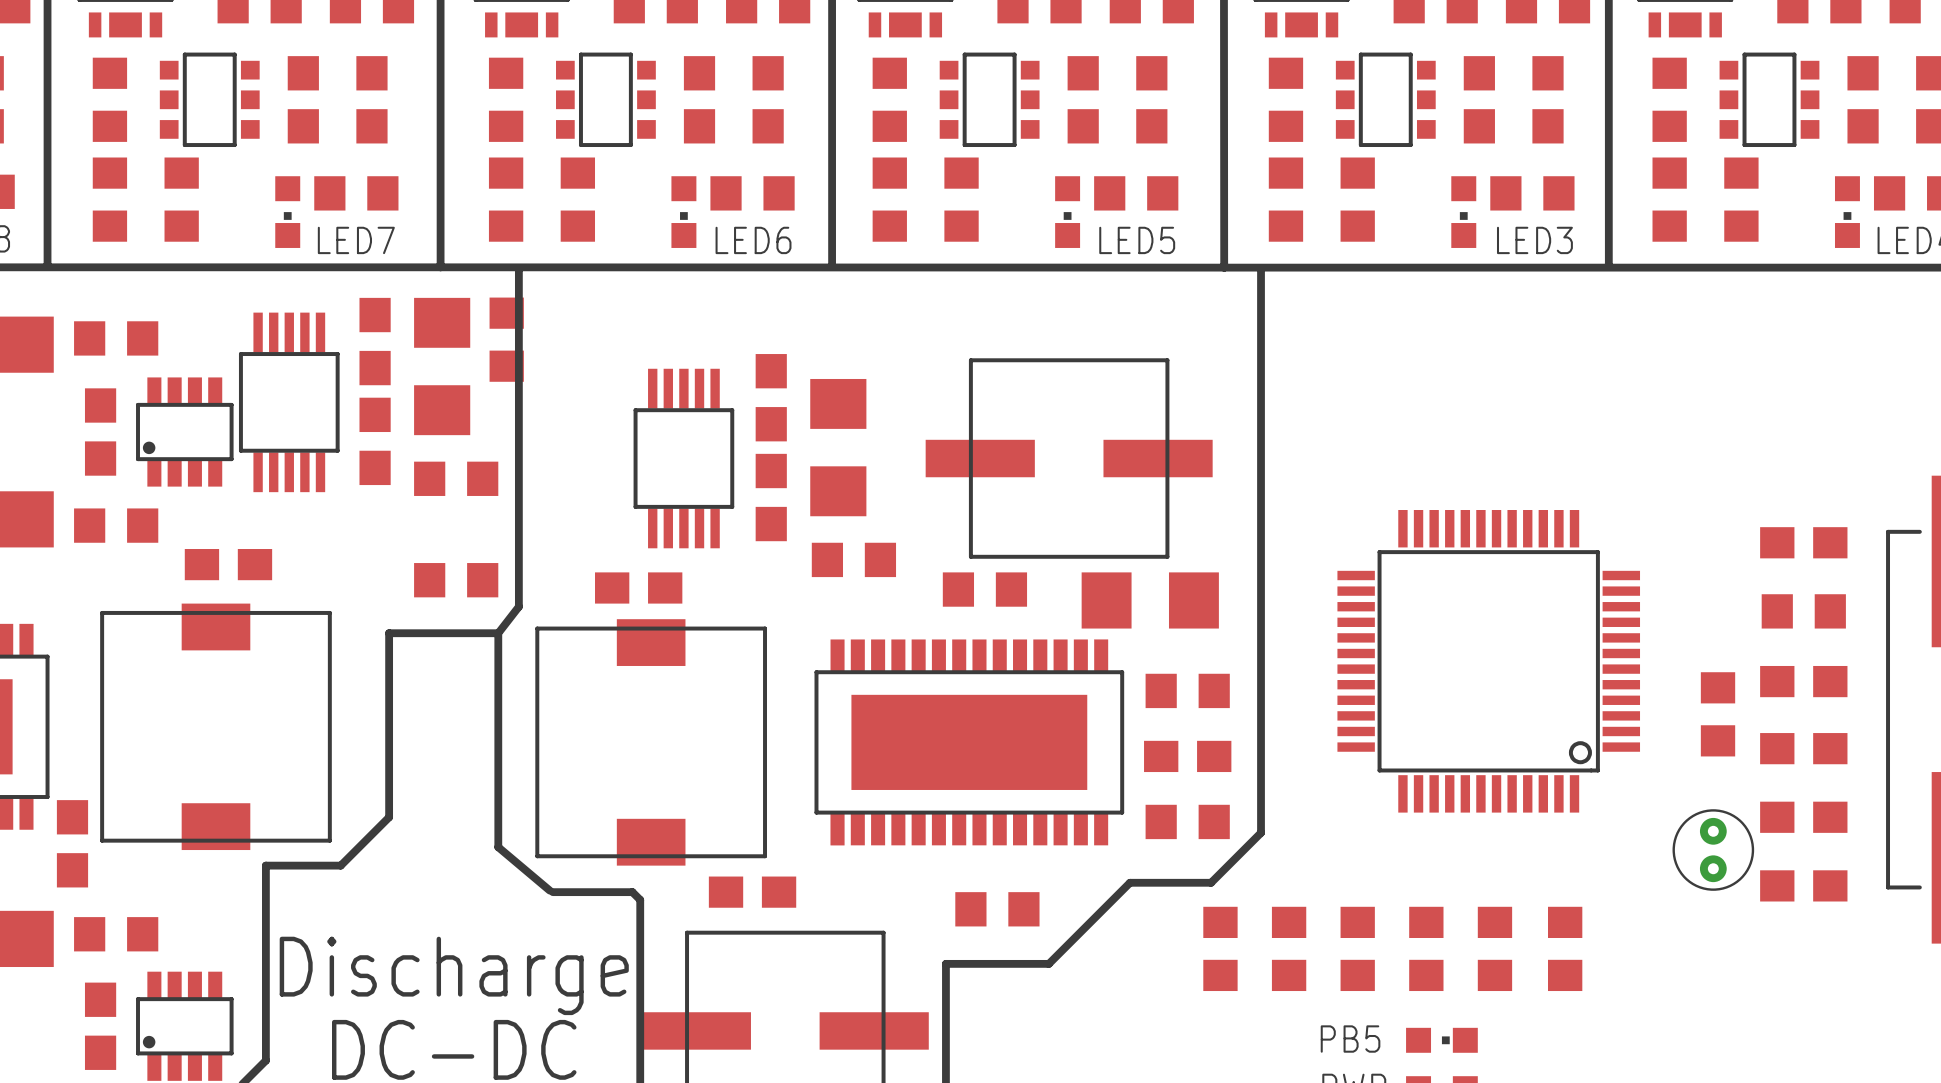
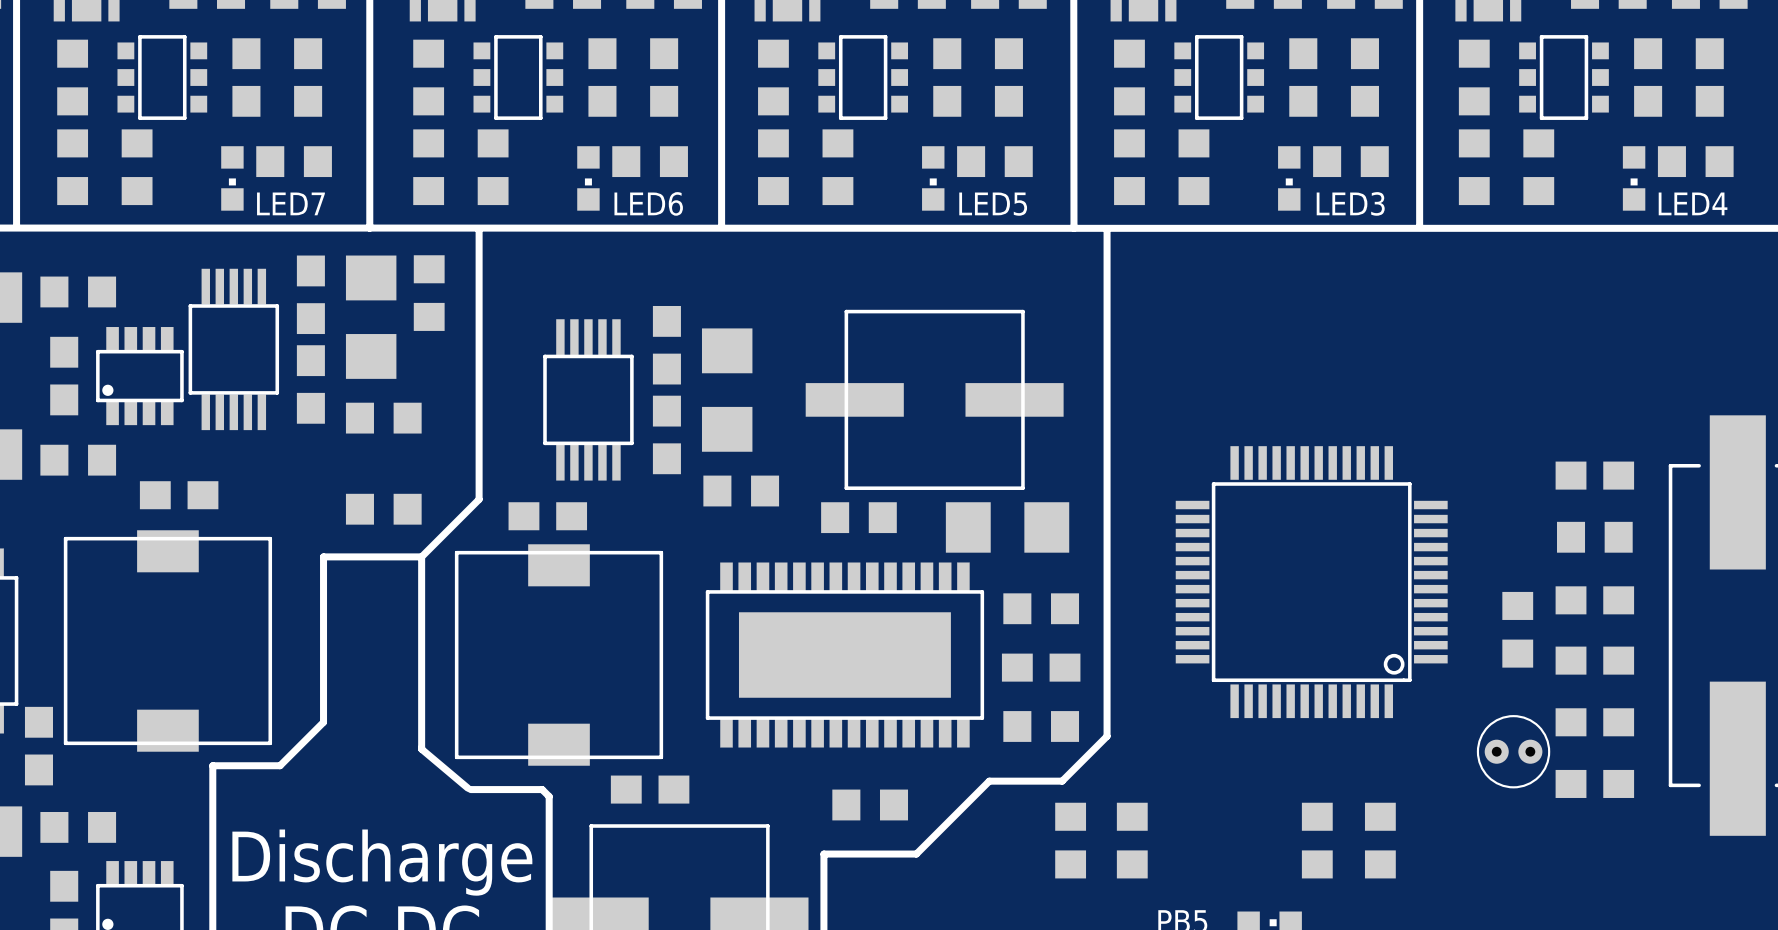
line: (518, 269) (518, 606) (498, 633) -> (479, 228) (479, 499) (421, 556)
part rotation: 0° (1713, 850) -> 90° clockwise (1513, 751)
part: (1357, 948) -> none
part: (1426, 948) -> none

